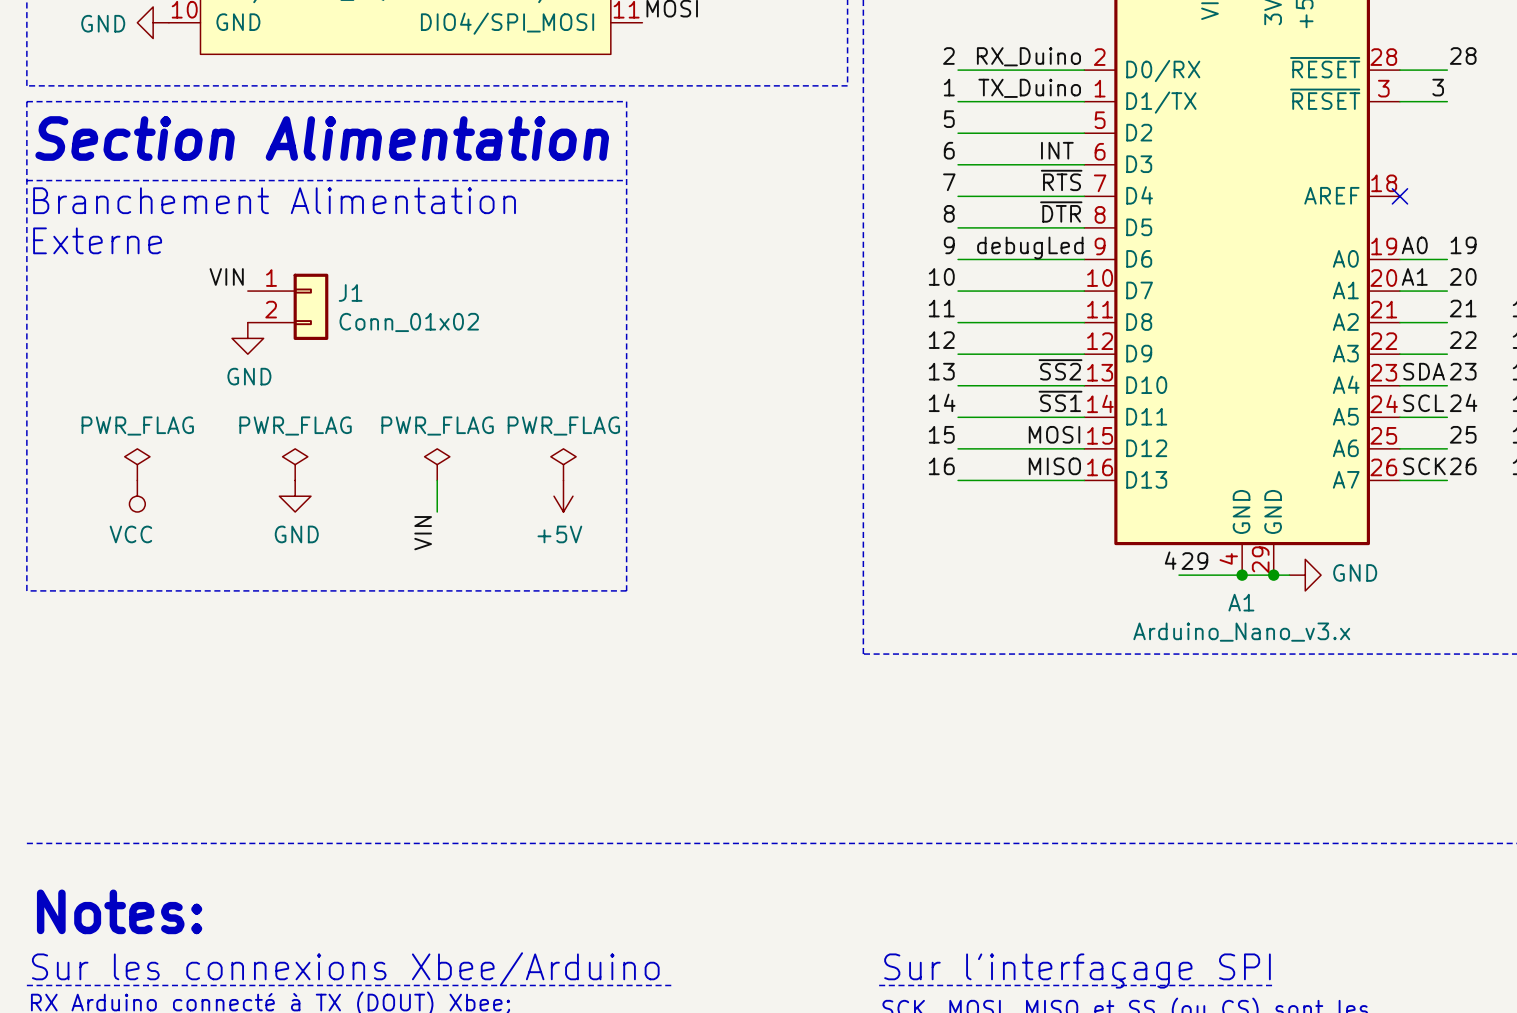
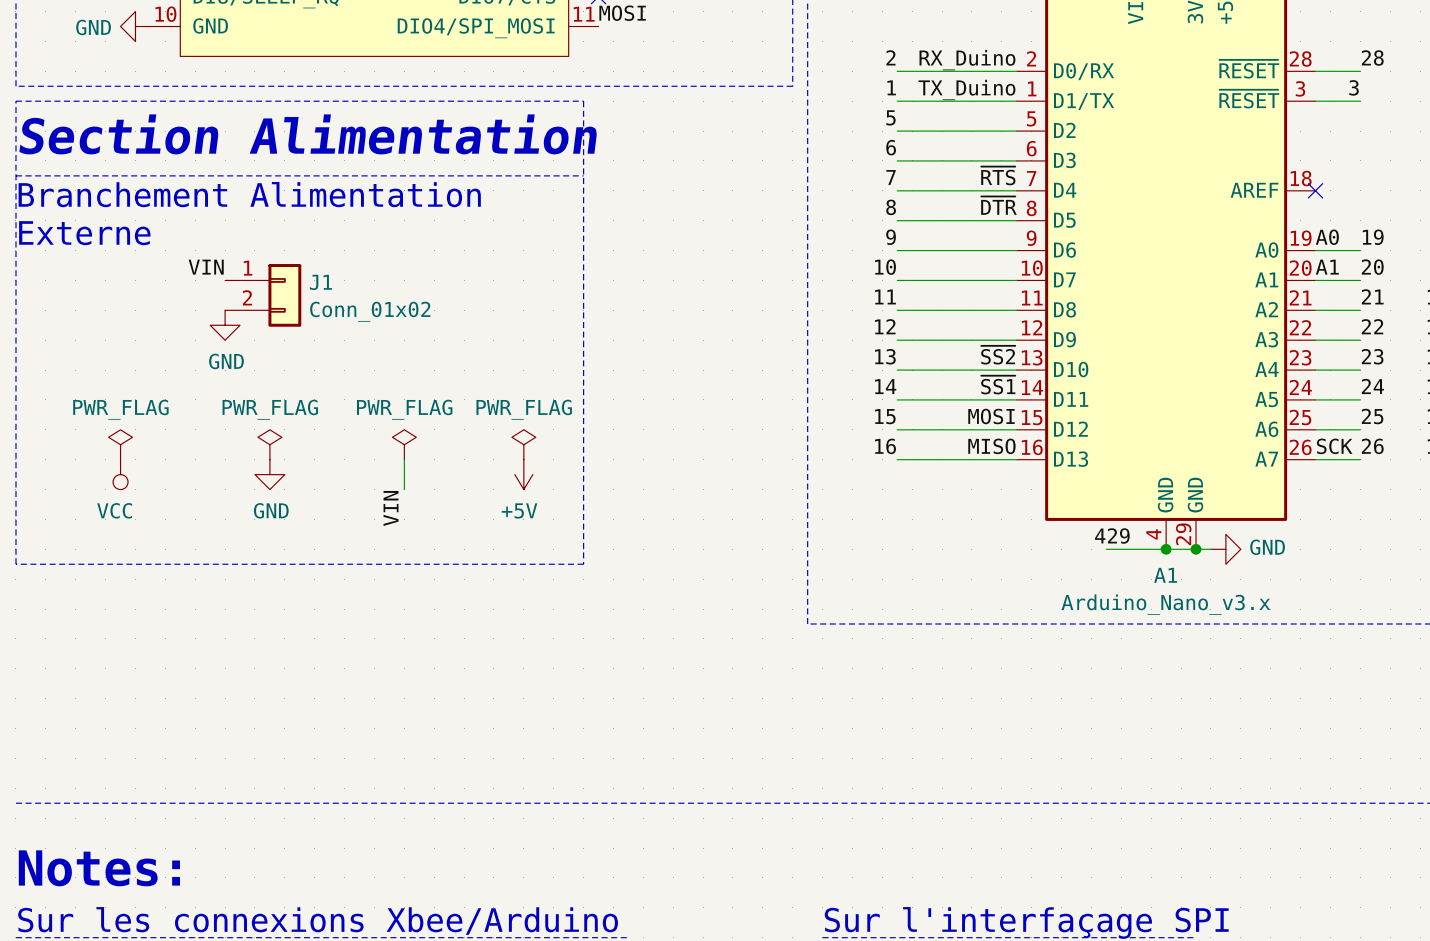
label: INT (1057, 150) -> none
label: debugLed (1030, 248) -> none
label: SDA (1424, 371) -> none
label: SCL (1423, 403) -> none

